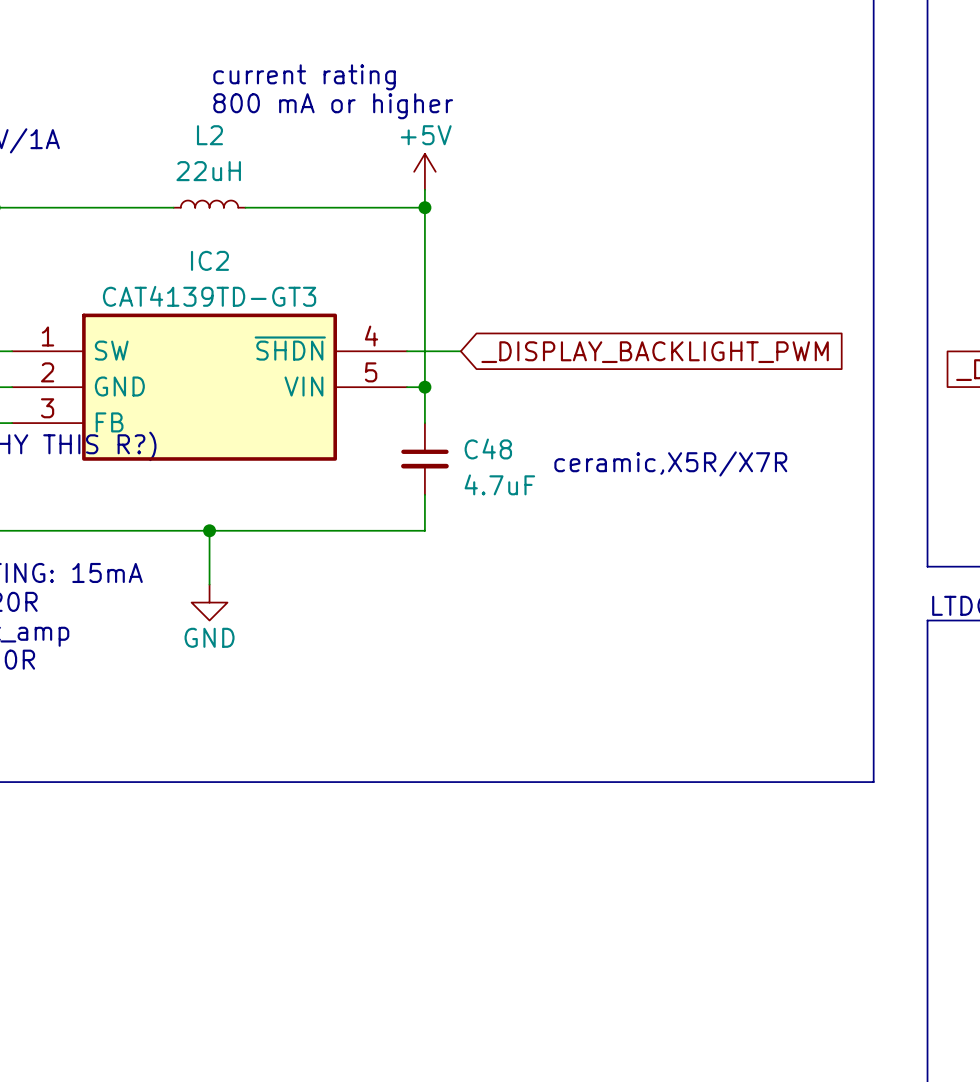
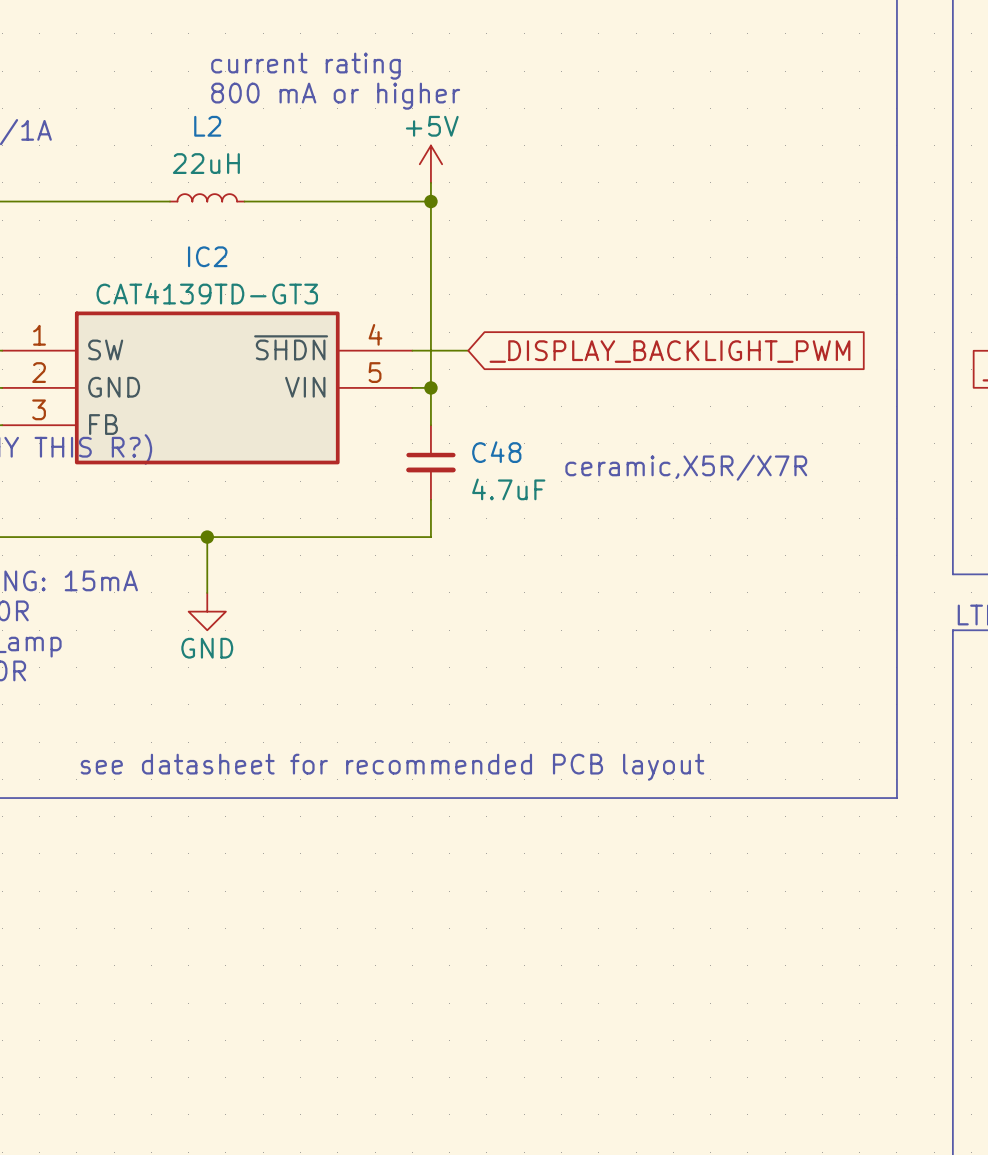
text: none -> see datasheet for recommended PCB layout (392, 767)

